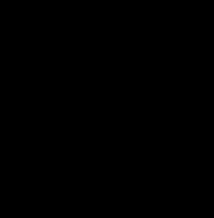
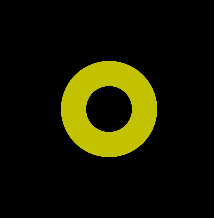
part: none -> (109, 109)

